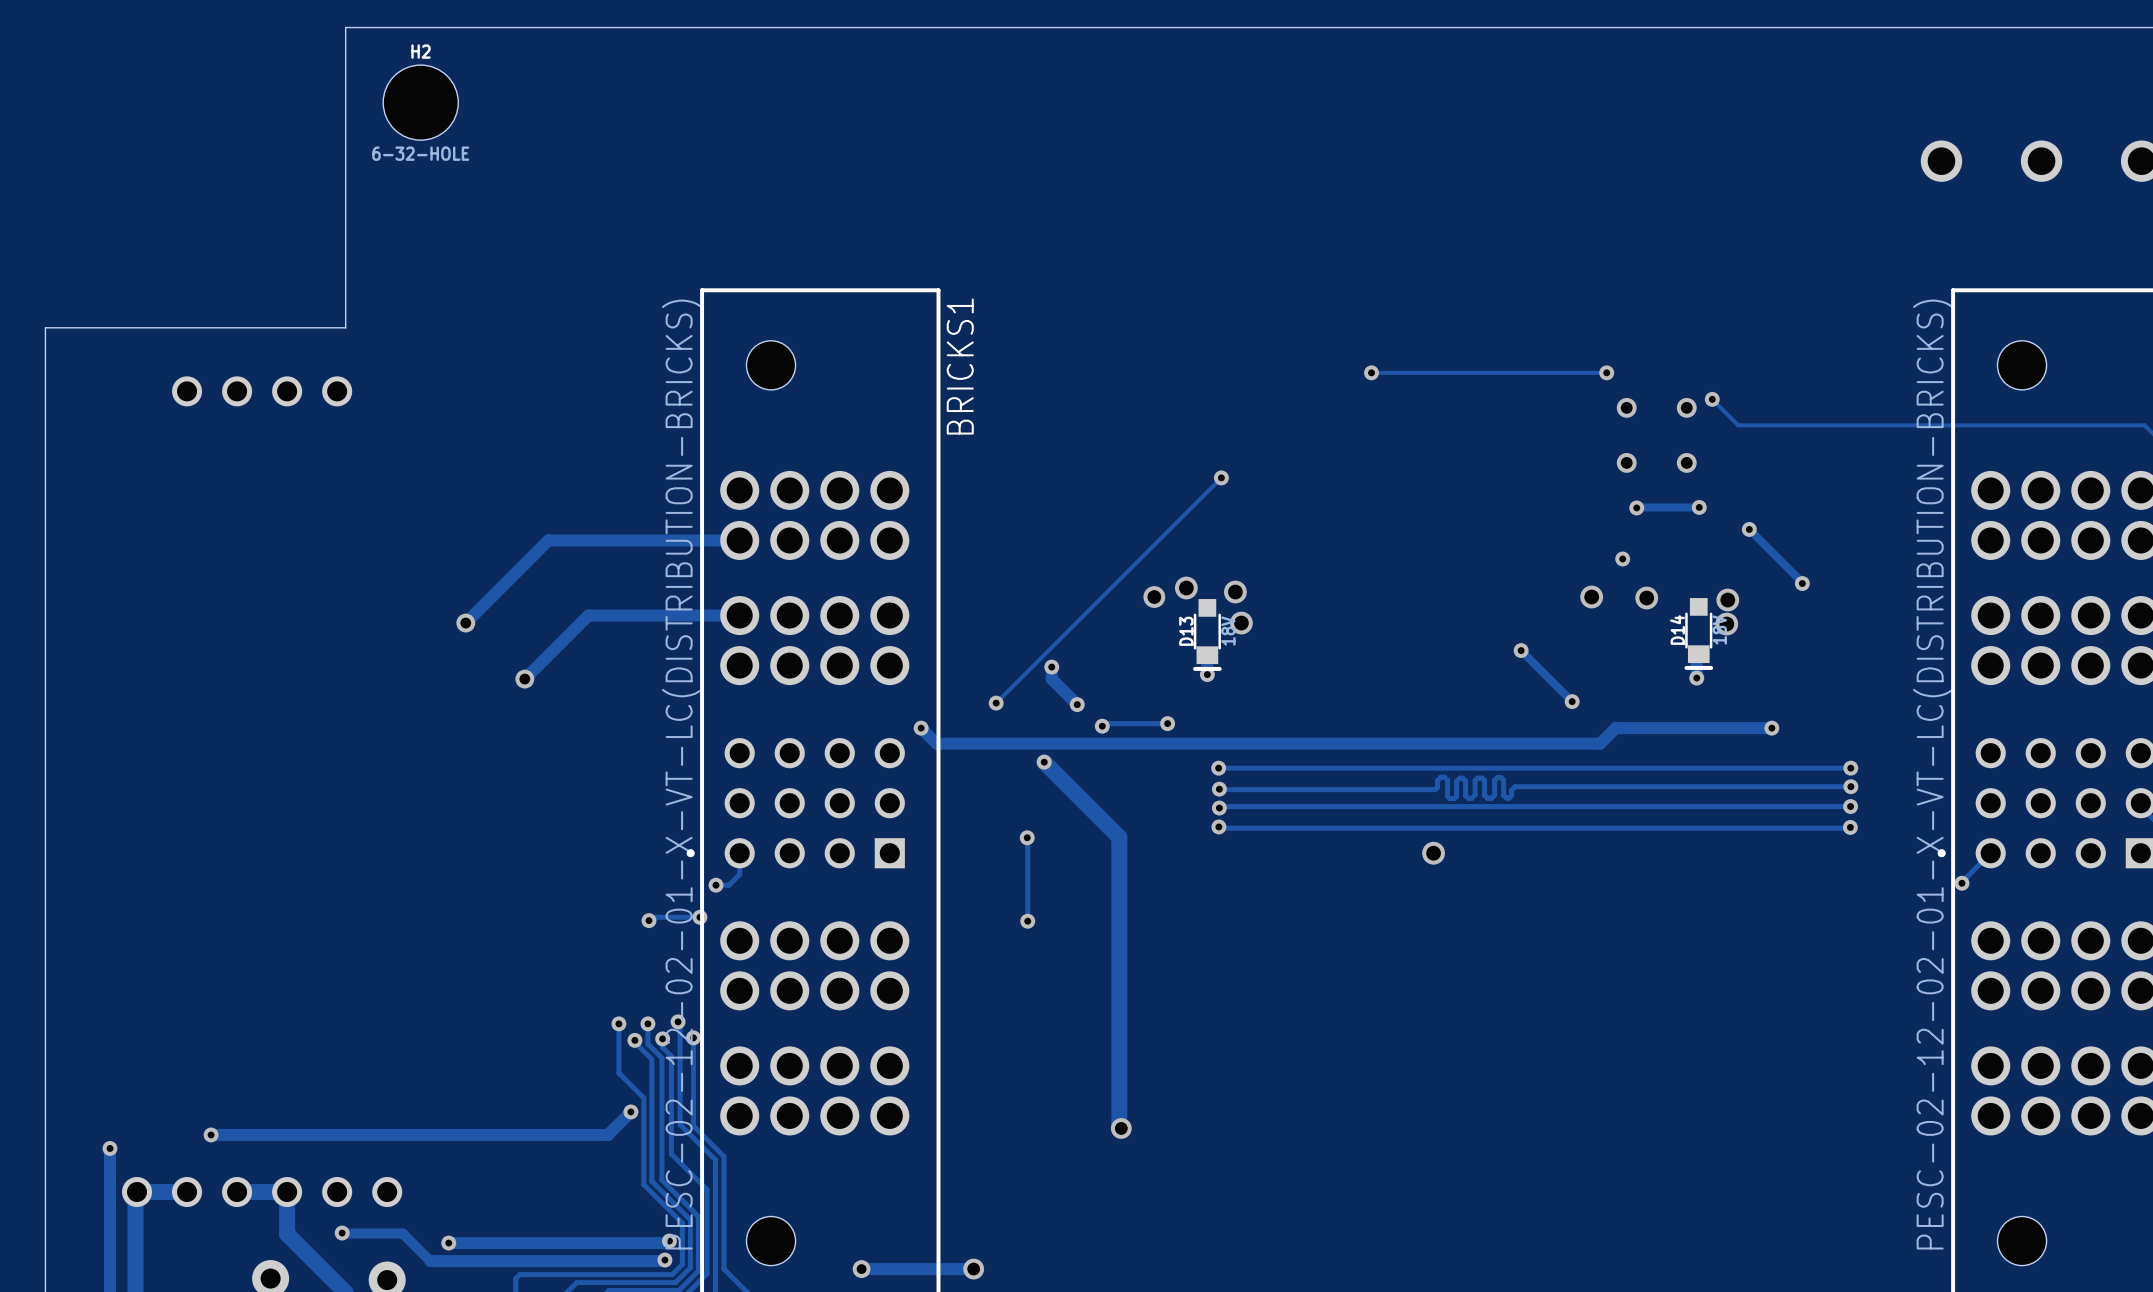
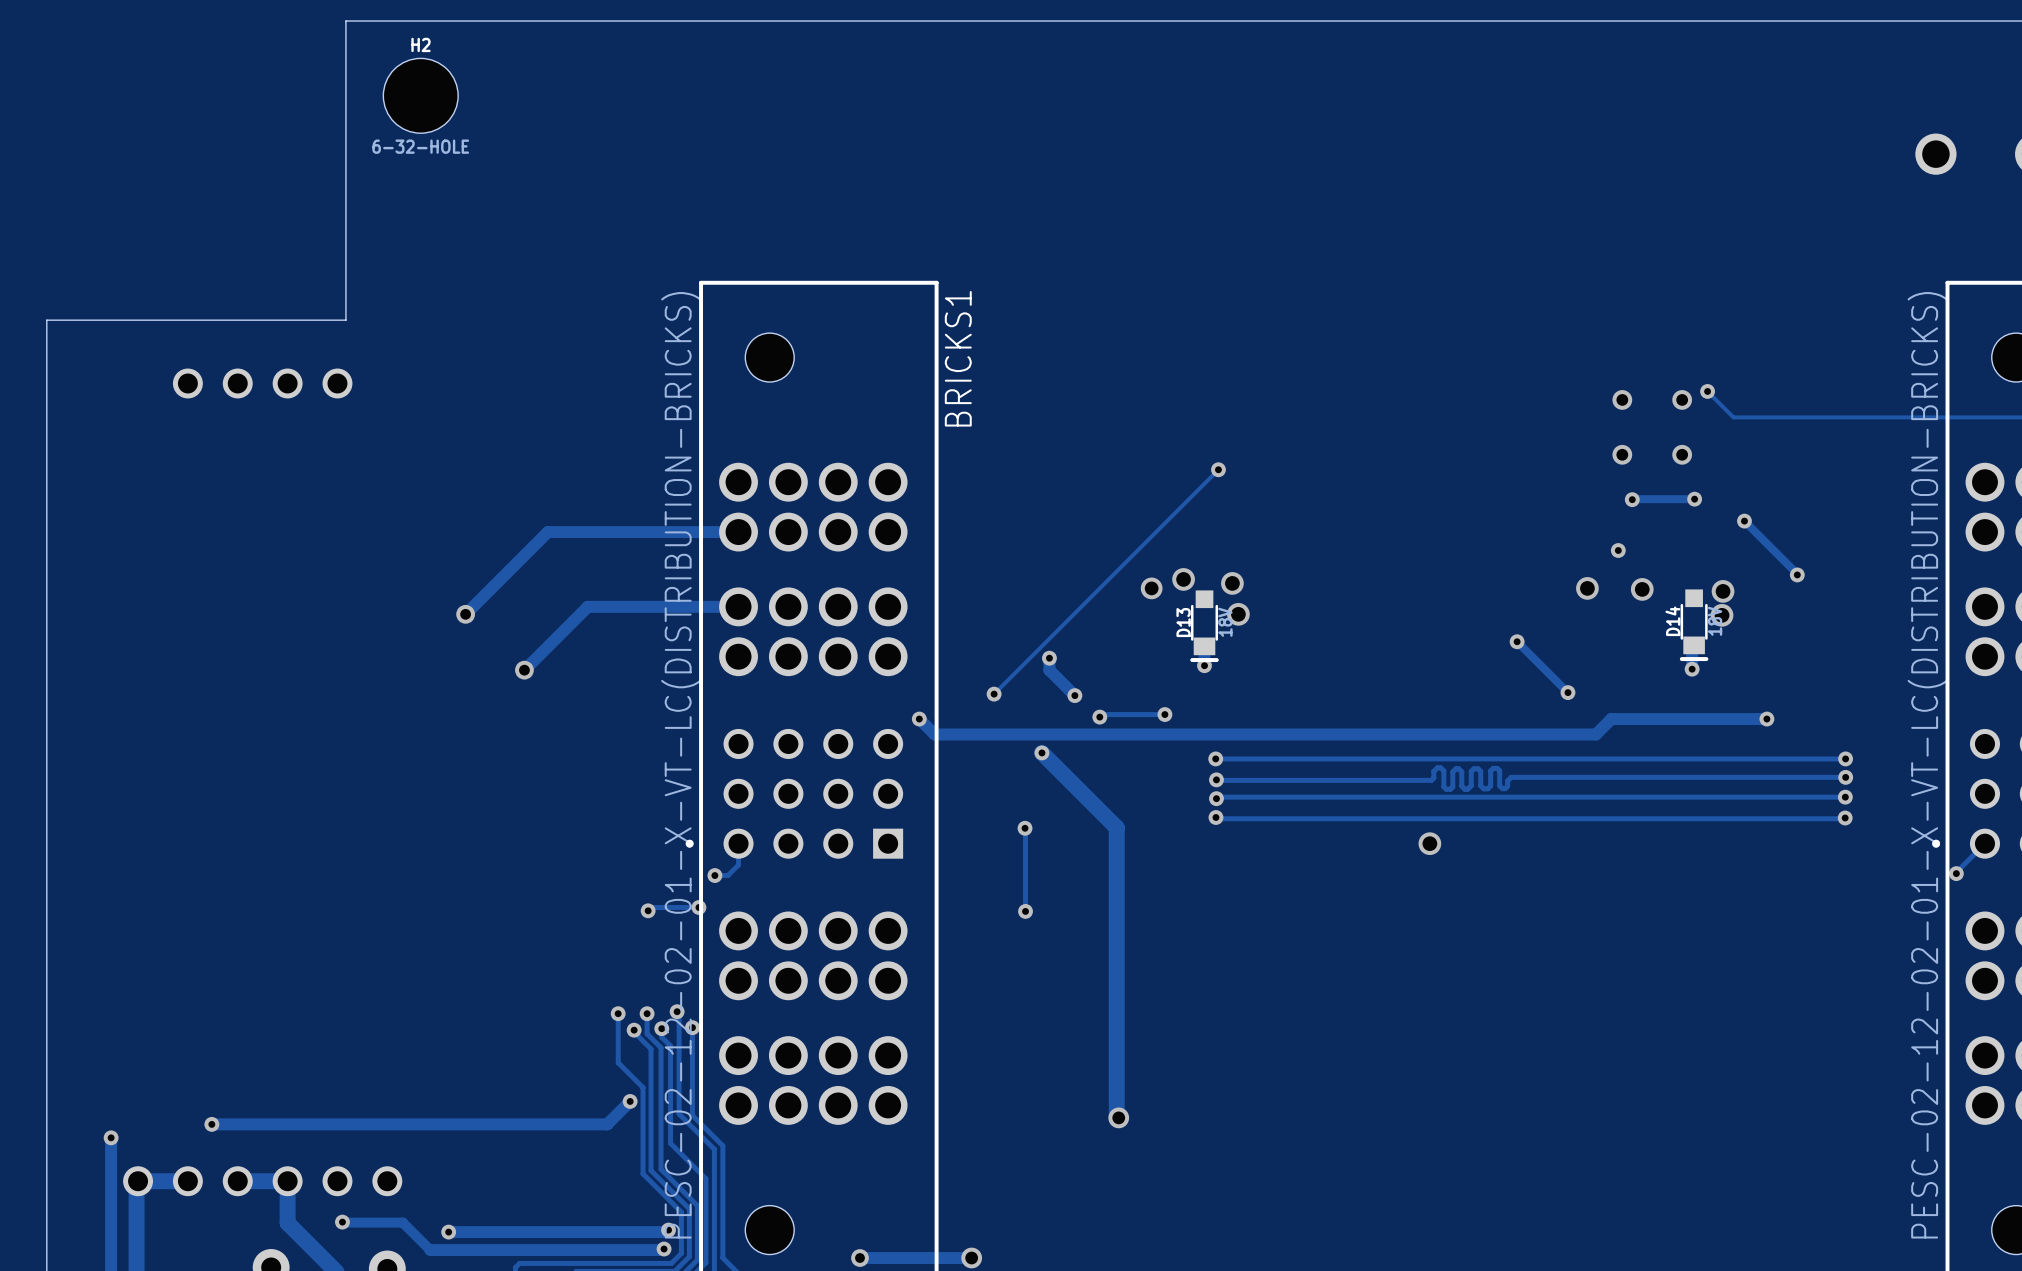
via: (1371, 372) -> none
track: (1606, 372) (1371, 372) -> none
via: (1606, 372) -> none

